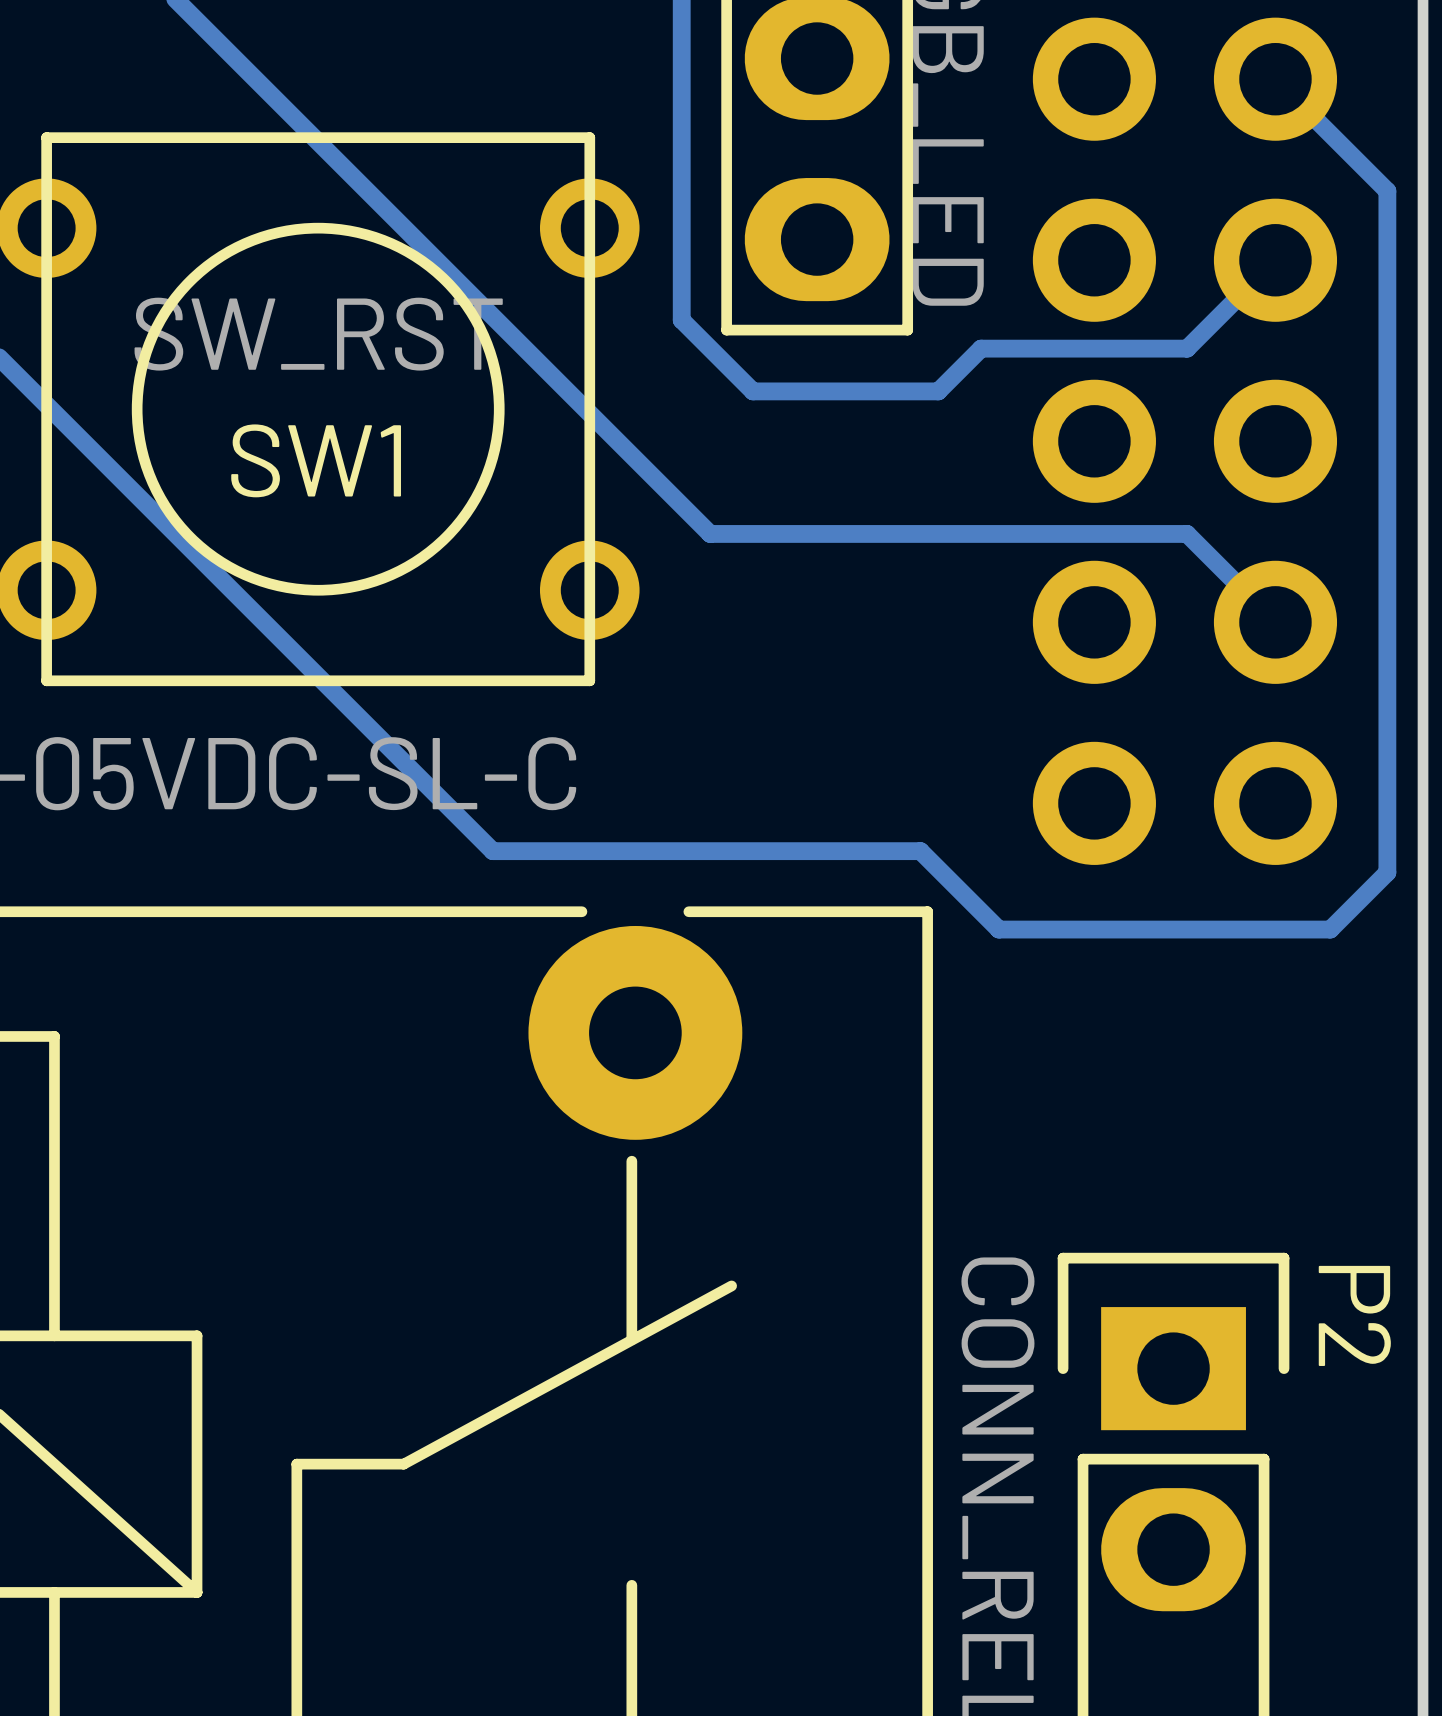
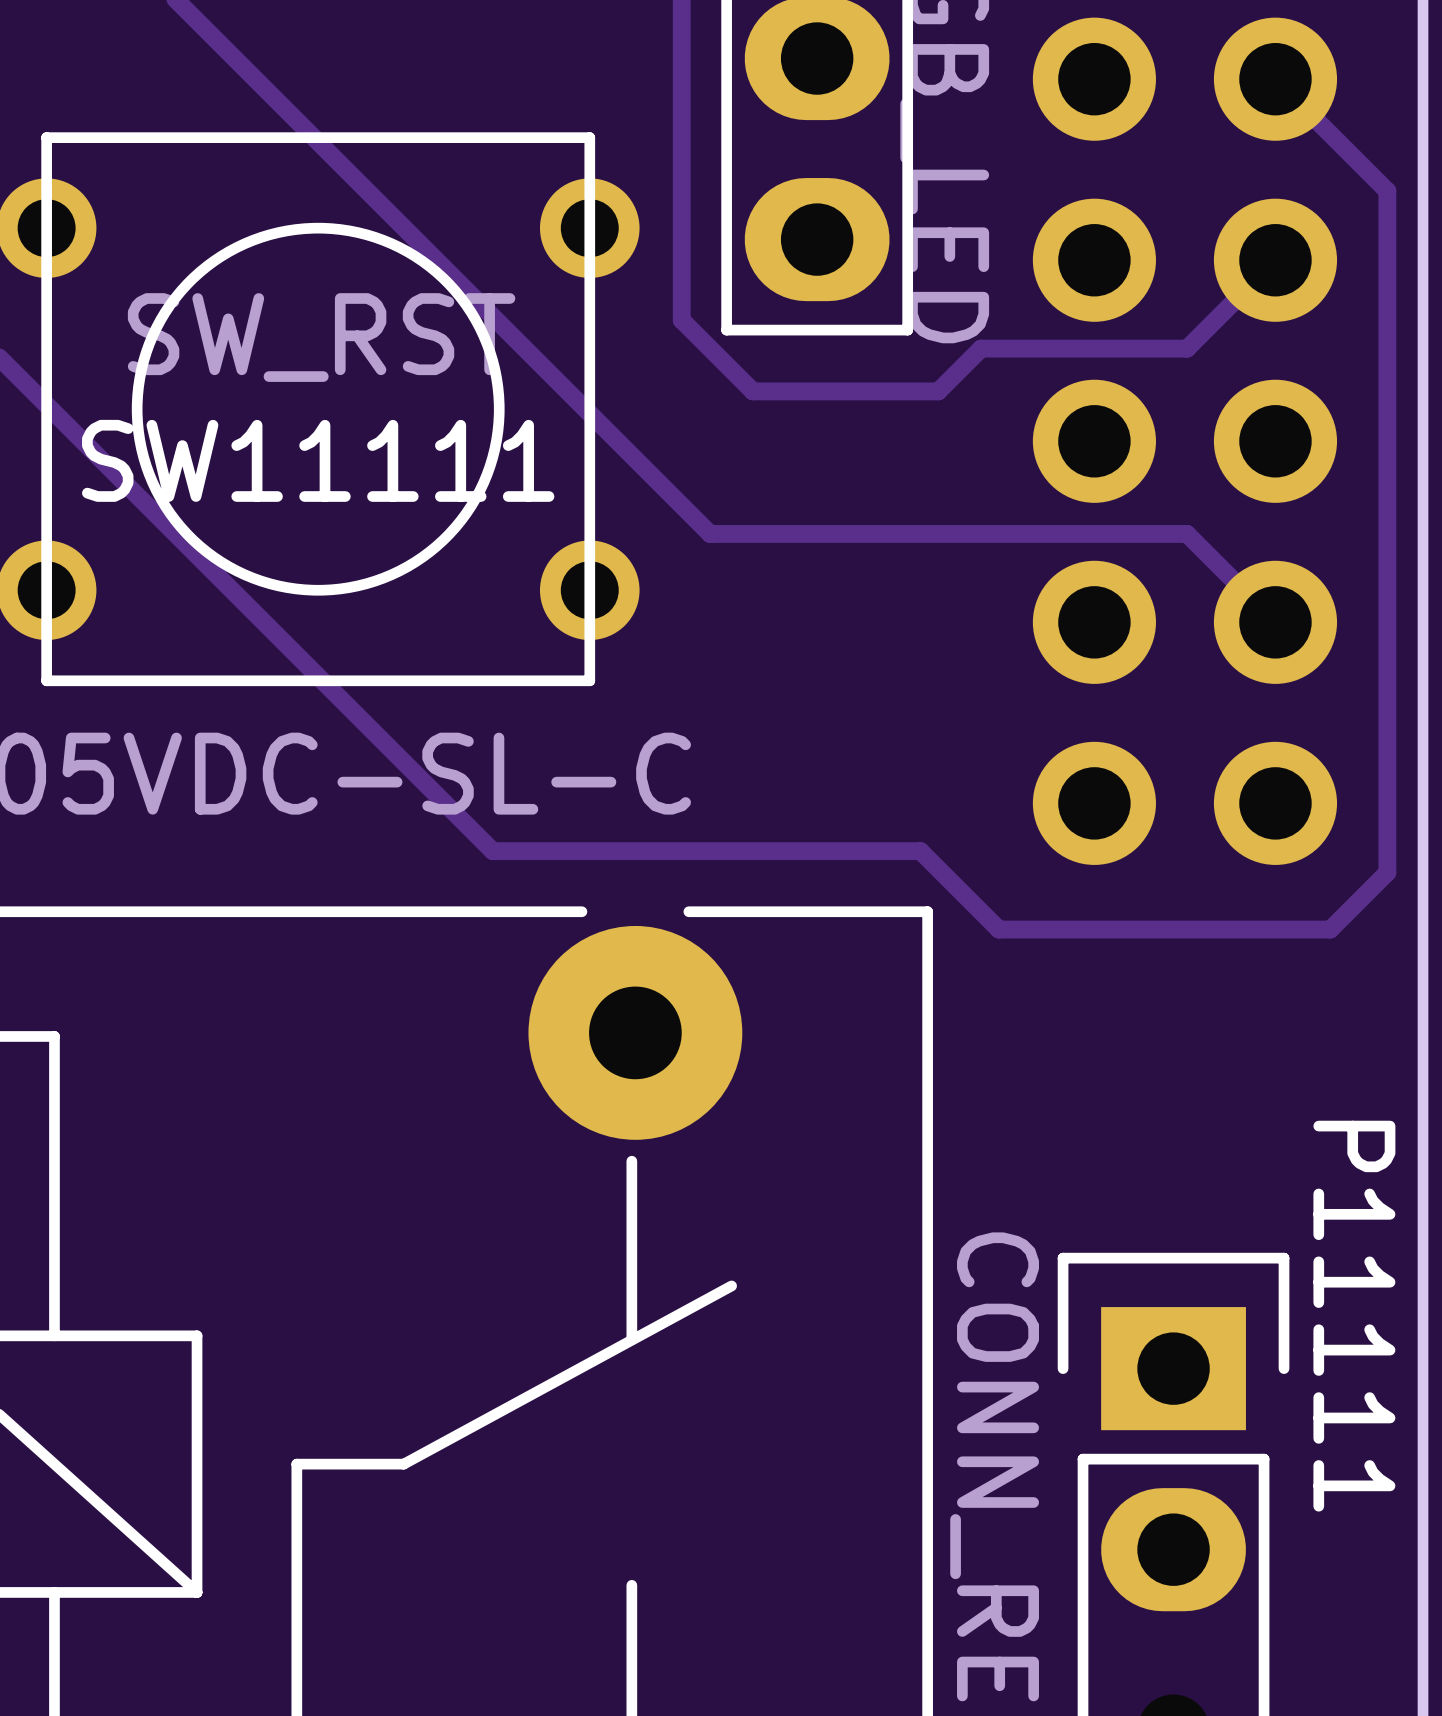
SW1 name: SW1 (316, 460) -> SW11111 (318, 460)
P2 name: P2 (1354, 1315) -> P11111 (1354, 1316)

